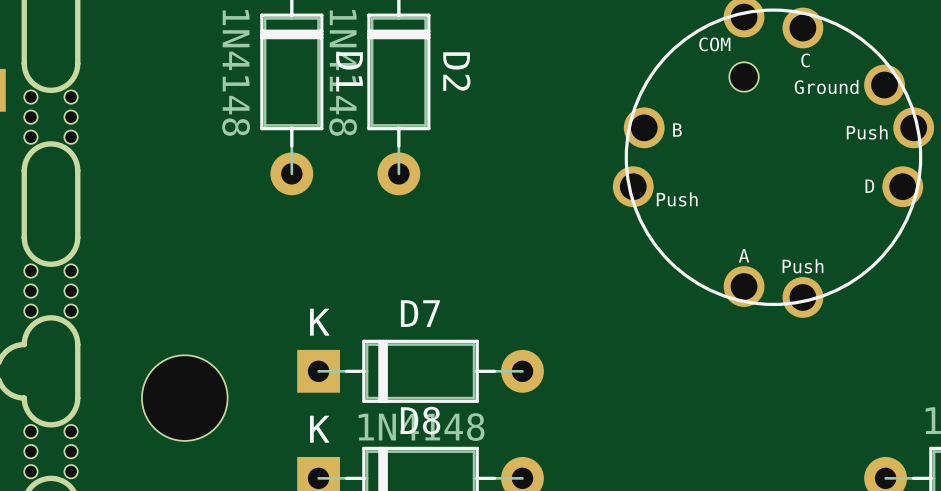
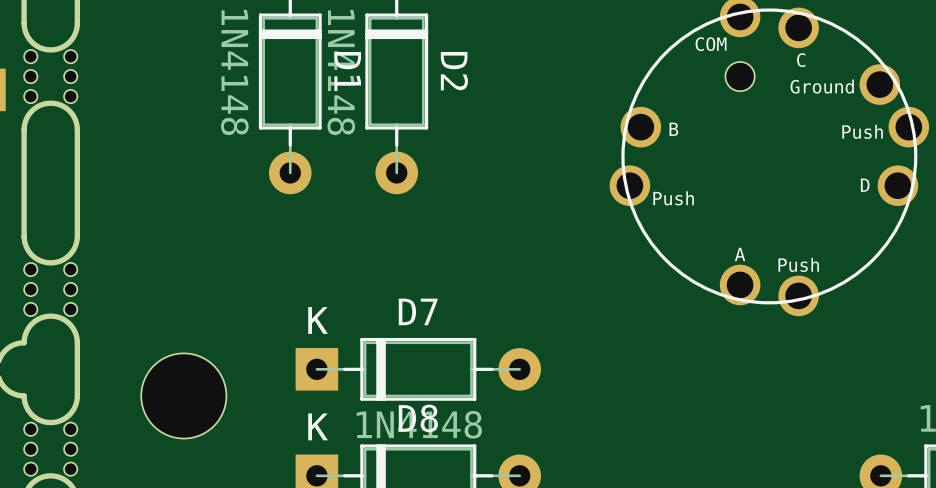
board edge: (77, 23) (77, 63) (75, 73) (64, 86) (51, 90) (37, 86) (26, 73) (24, 63) (24, 23) -> (77, 23) (75, 33) (69, 42) (60, 47) (50, 49) (40, 47) (31, 42) (26, 33) (24, 23)
part position: (51, 117) -> (50, 76)
board edge: (77, 170) (75, 160) (69, 151) (61, 145) (51, 143) (40, 145) (32, 151) (26, 160) (24, 170) -> (77, 169) (77, 129) (75, 119) (64, 106) (50, 103) (37, 106) (26, 119) (24, 129) (24, 169)

